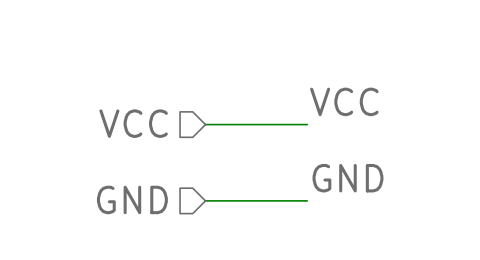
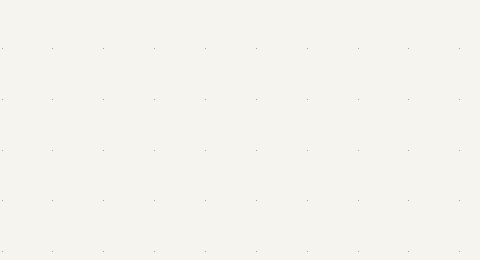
label: VCC (344, 101) -> none
hierarchical label: VCC (133, 123) -> none
wire: (205, 124) (307, 124) -> none
label: GND (347, 178) -> none
hierarchical label: GND (132, 199) -> none
wire: (205, 200) (307, 200) -> none

